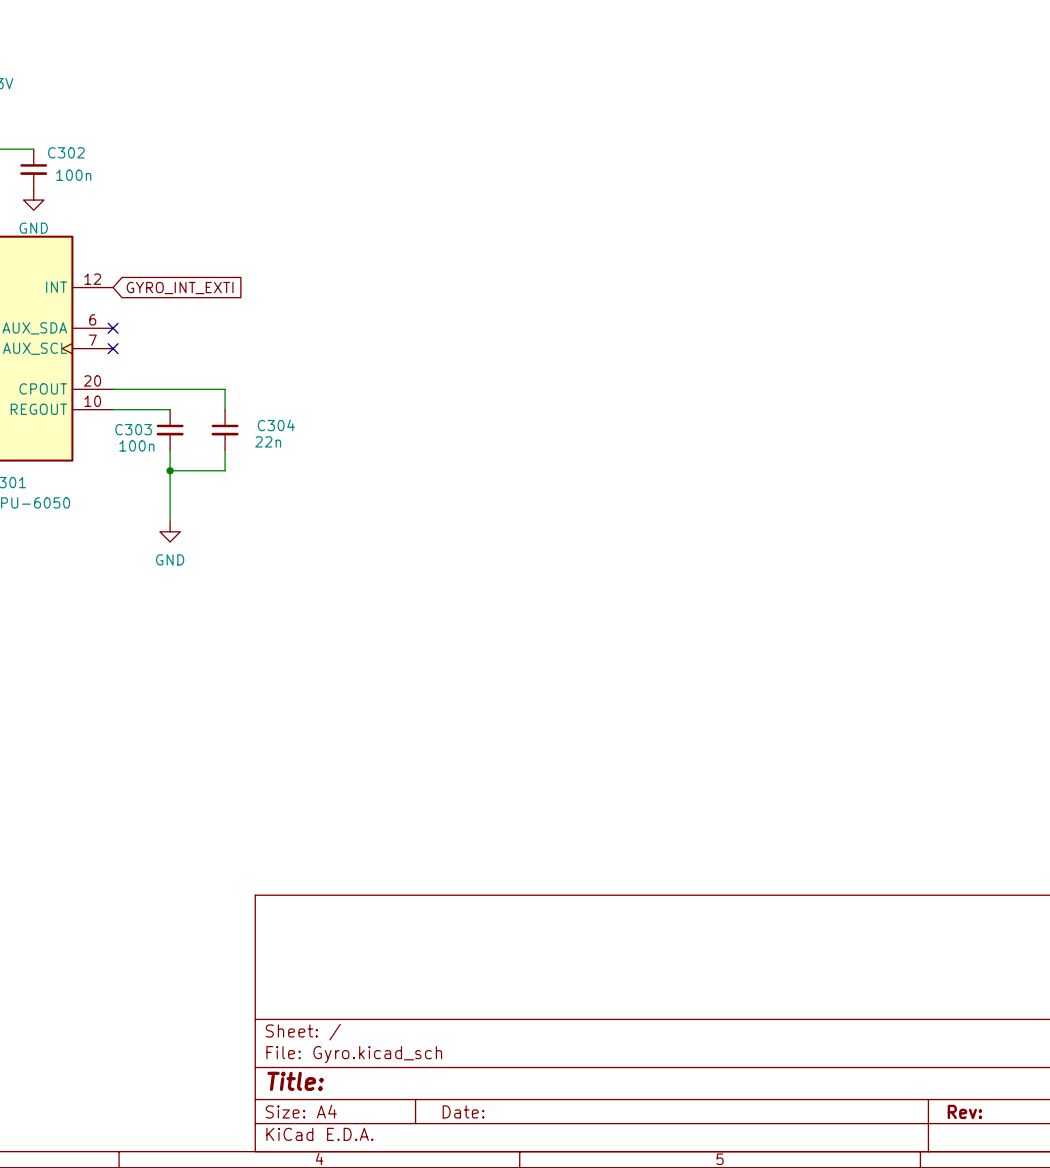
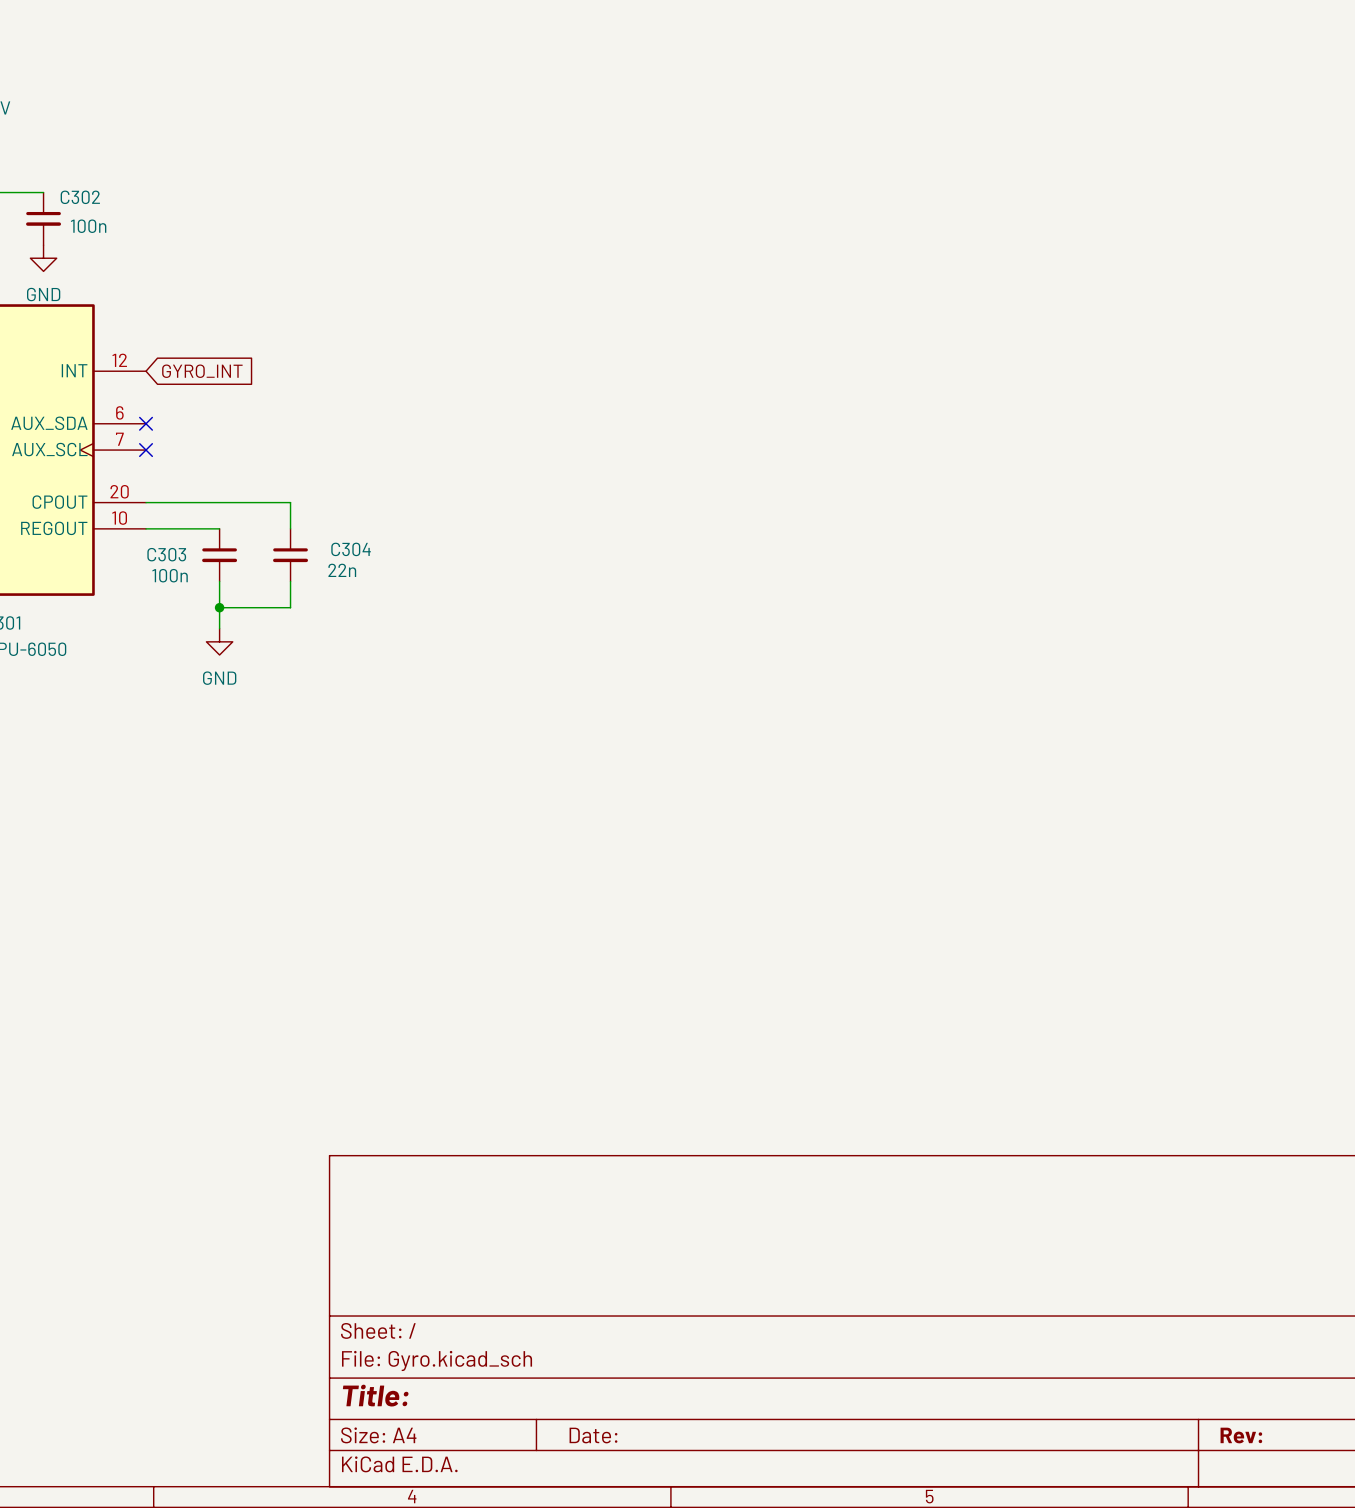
global label: GYRO_INT_EXTI (180, 288) -> GYRO_INT (202, 371)
wire: (170, 487) (170, 521) -> none
power symbol position: GND (170, 531) -> GND (219, 641)

